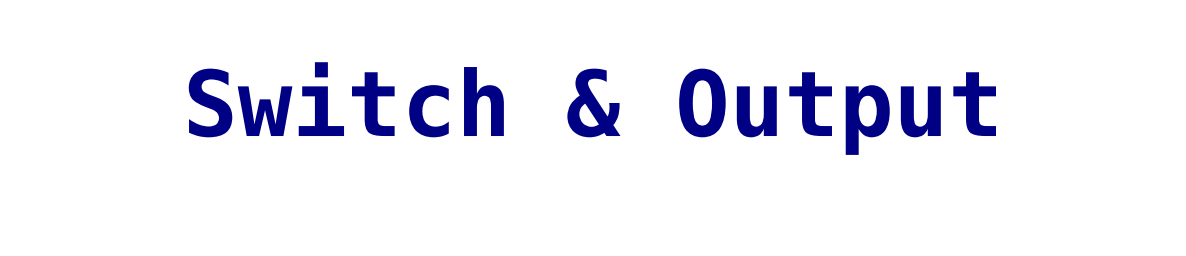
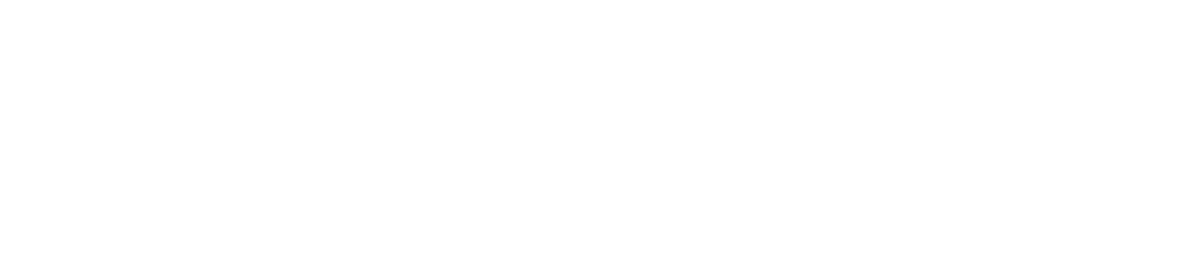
text: Switch & Output (592, 108) -> none

